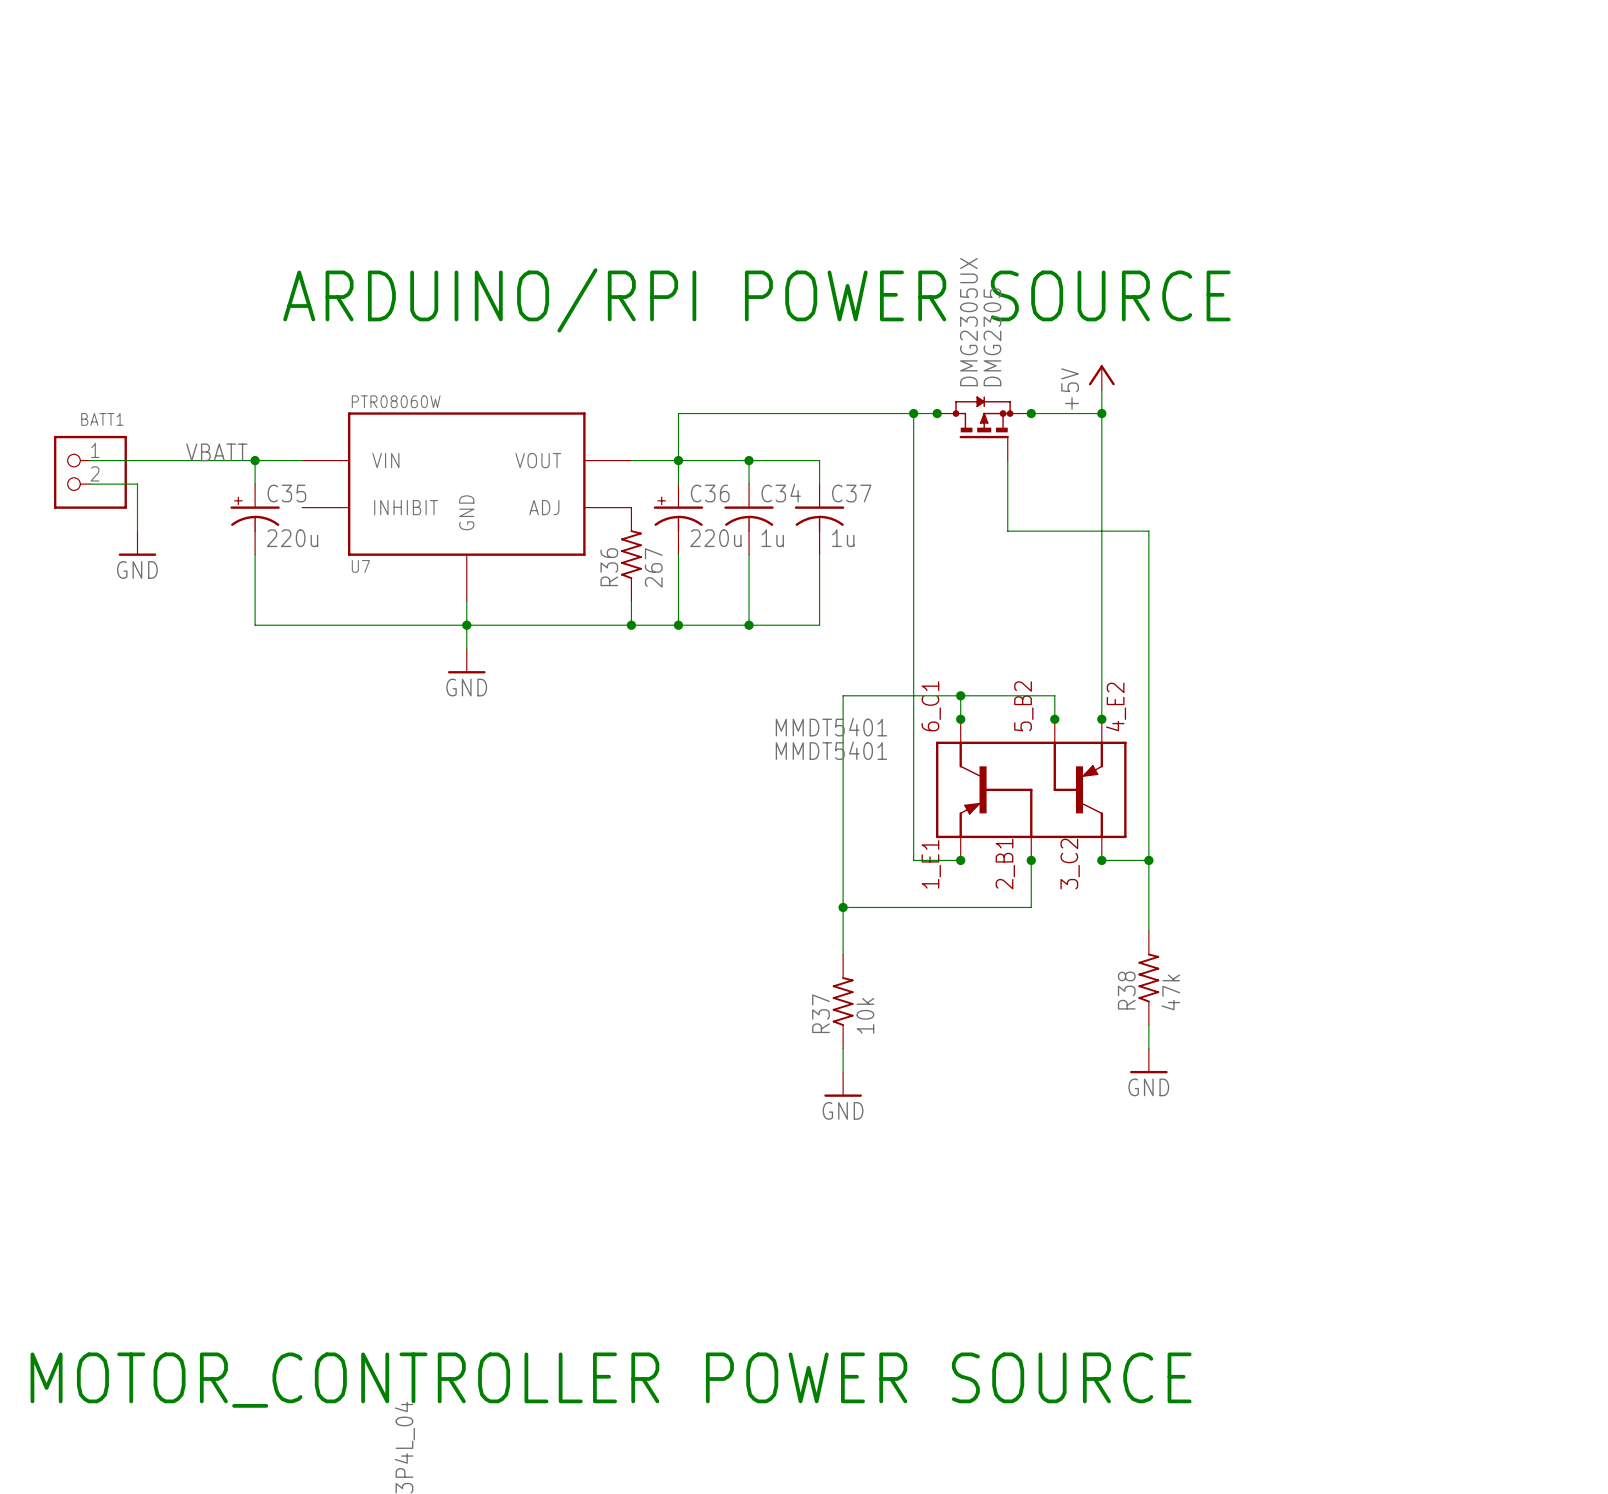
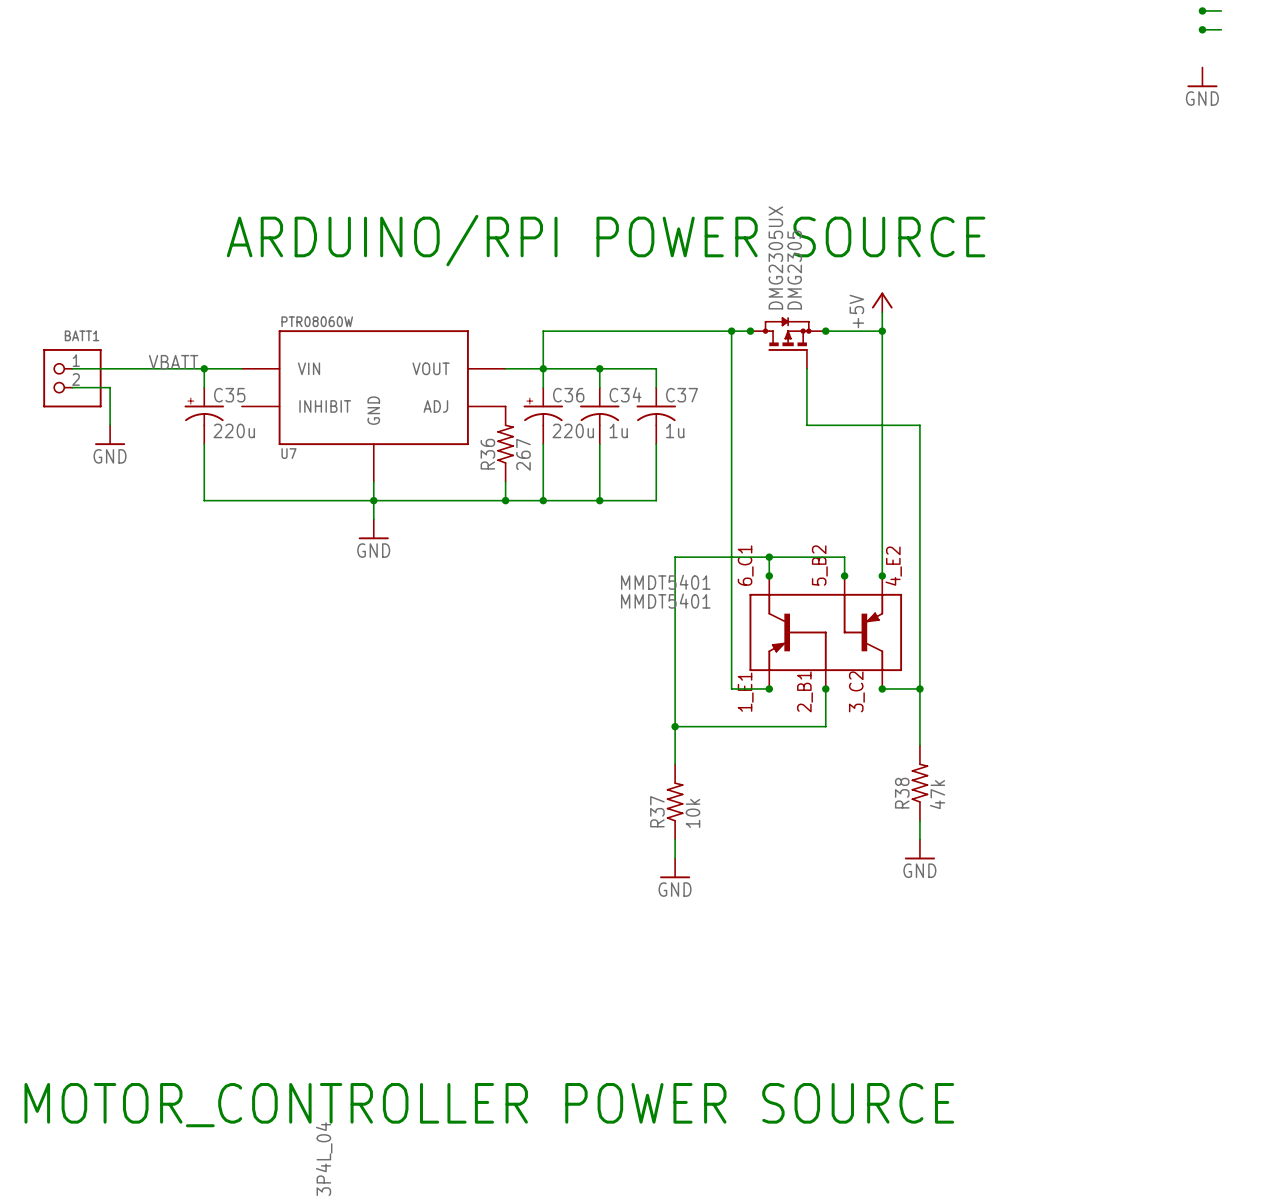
wire: none -> (1202, 10) (1221, 10)
junction: none -> (1202, 10)
wire: none -> (1202, 29) (1221, 29)
junction: none -> (1202, 29)
power symbol: none -> GND (1202, 77)

